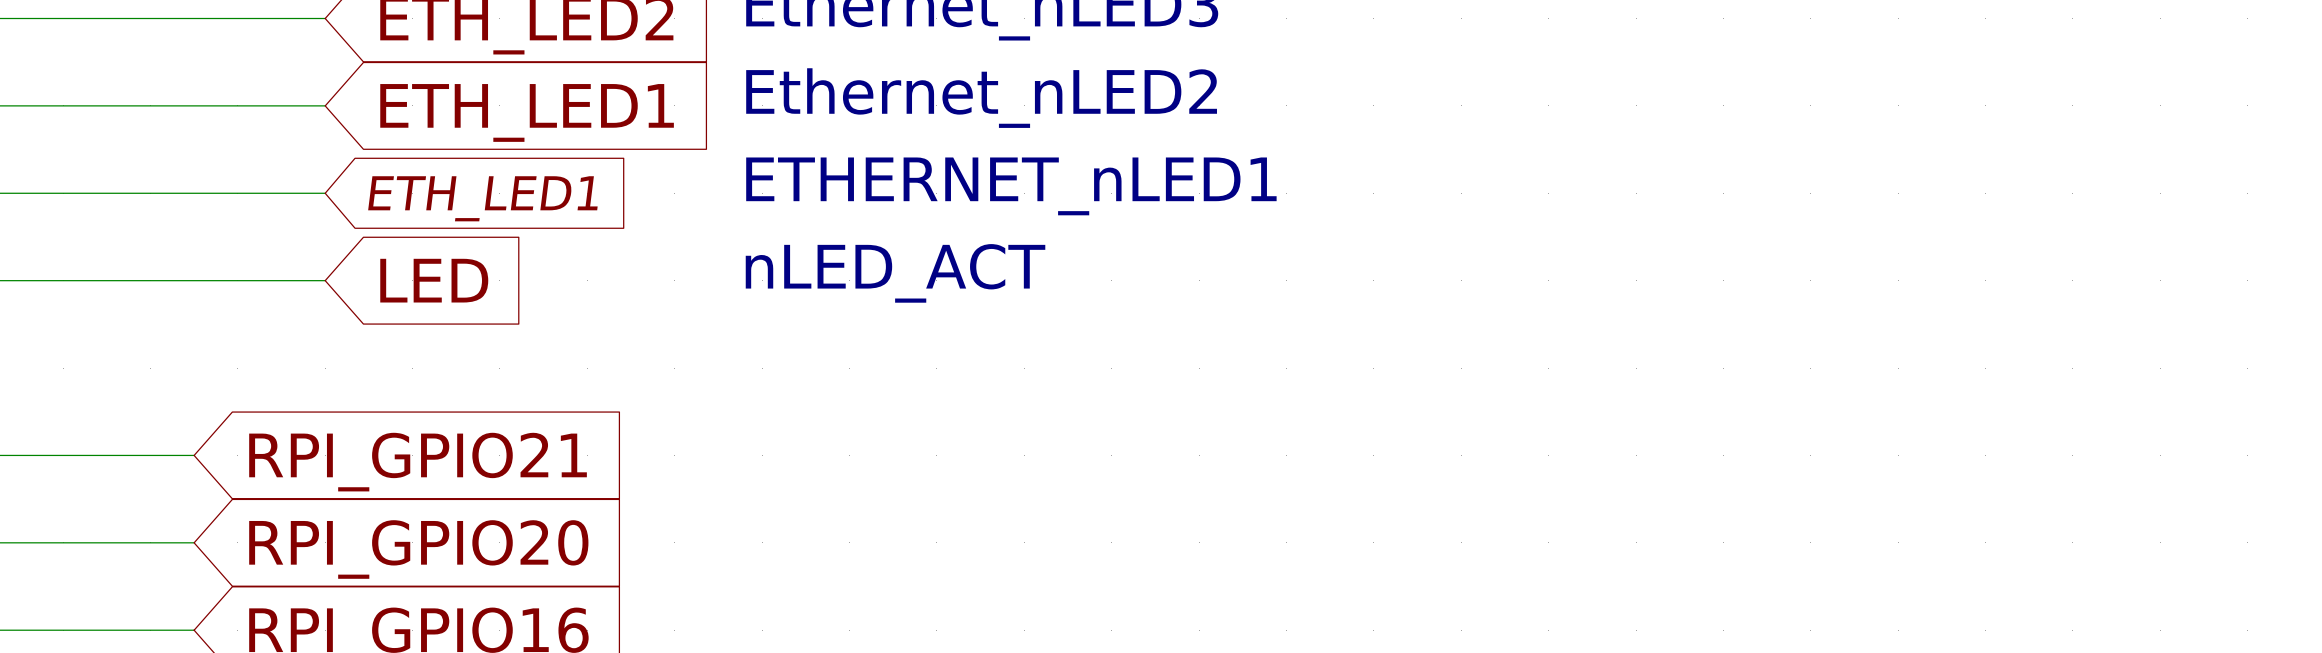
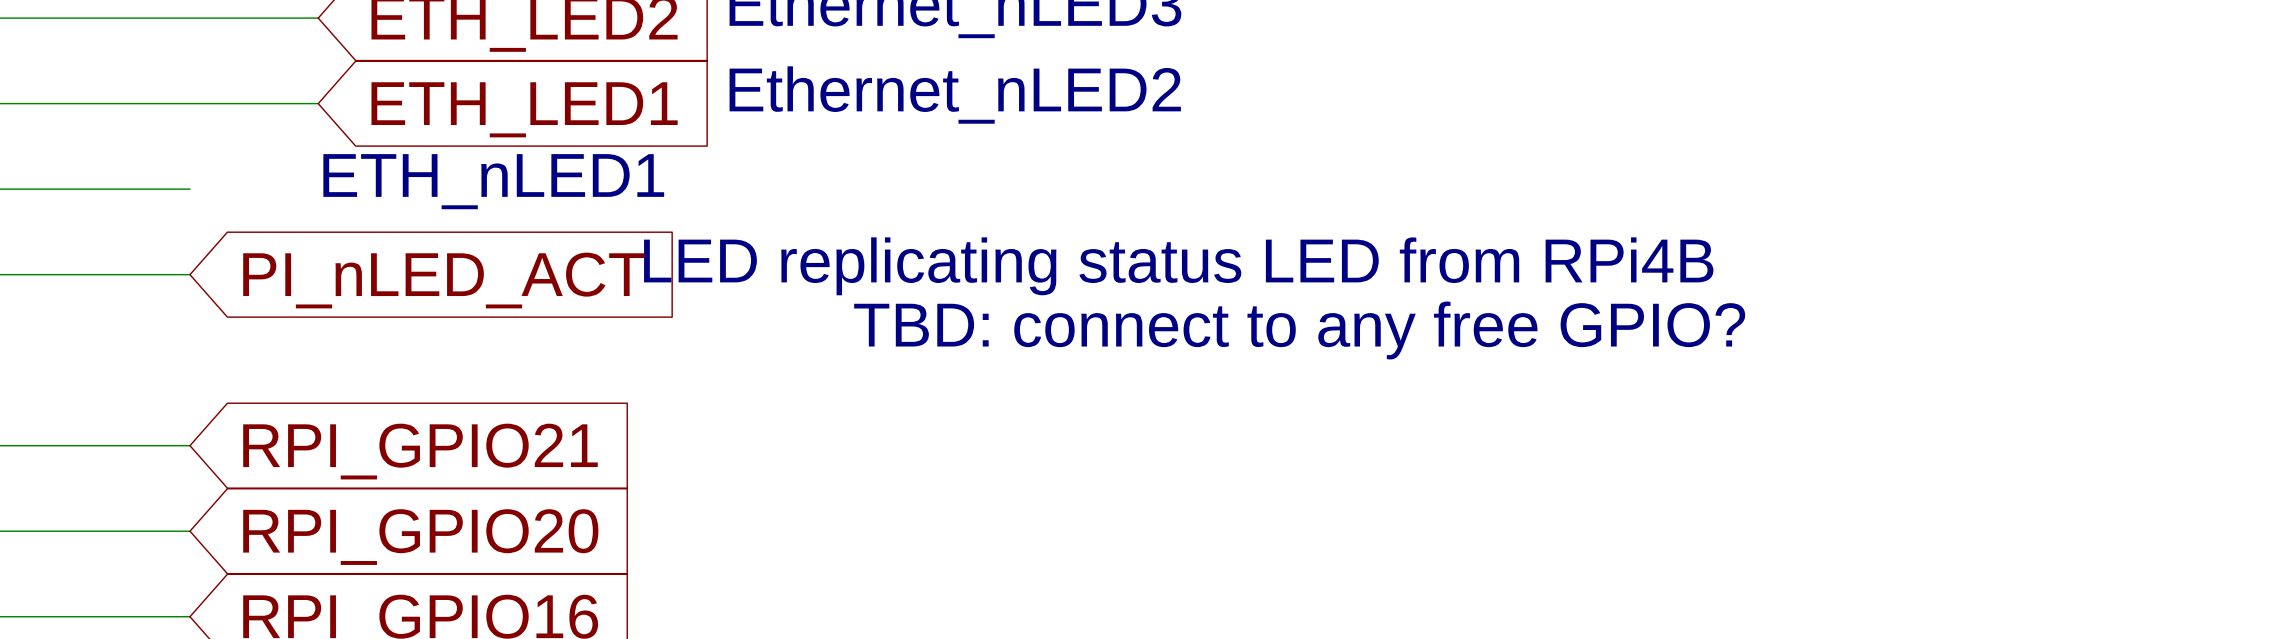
text: none -> ETH_nLED1 (493, 181)
text: ETHERNET_nLED1 (1011, 186) -> none
wire: (194, 193) (325, 193) -> none
global label: ETH_LED1 (482, 198) -> none
text: none -> LED replicating status LED from RPi4B (1178, 266)
text: nLED_ACT (895, 273) -> none
wire: (194, 280) (325, 280) -> none
global label: LED (434, 280) -> none
global label: none -> PI_nLED_ACT (443, 280)
text: none -> TBD: connect to any free GPIO? (1299, 330)

